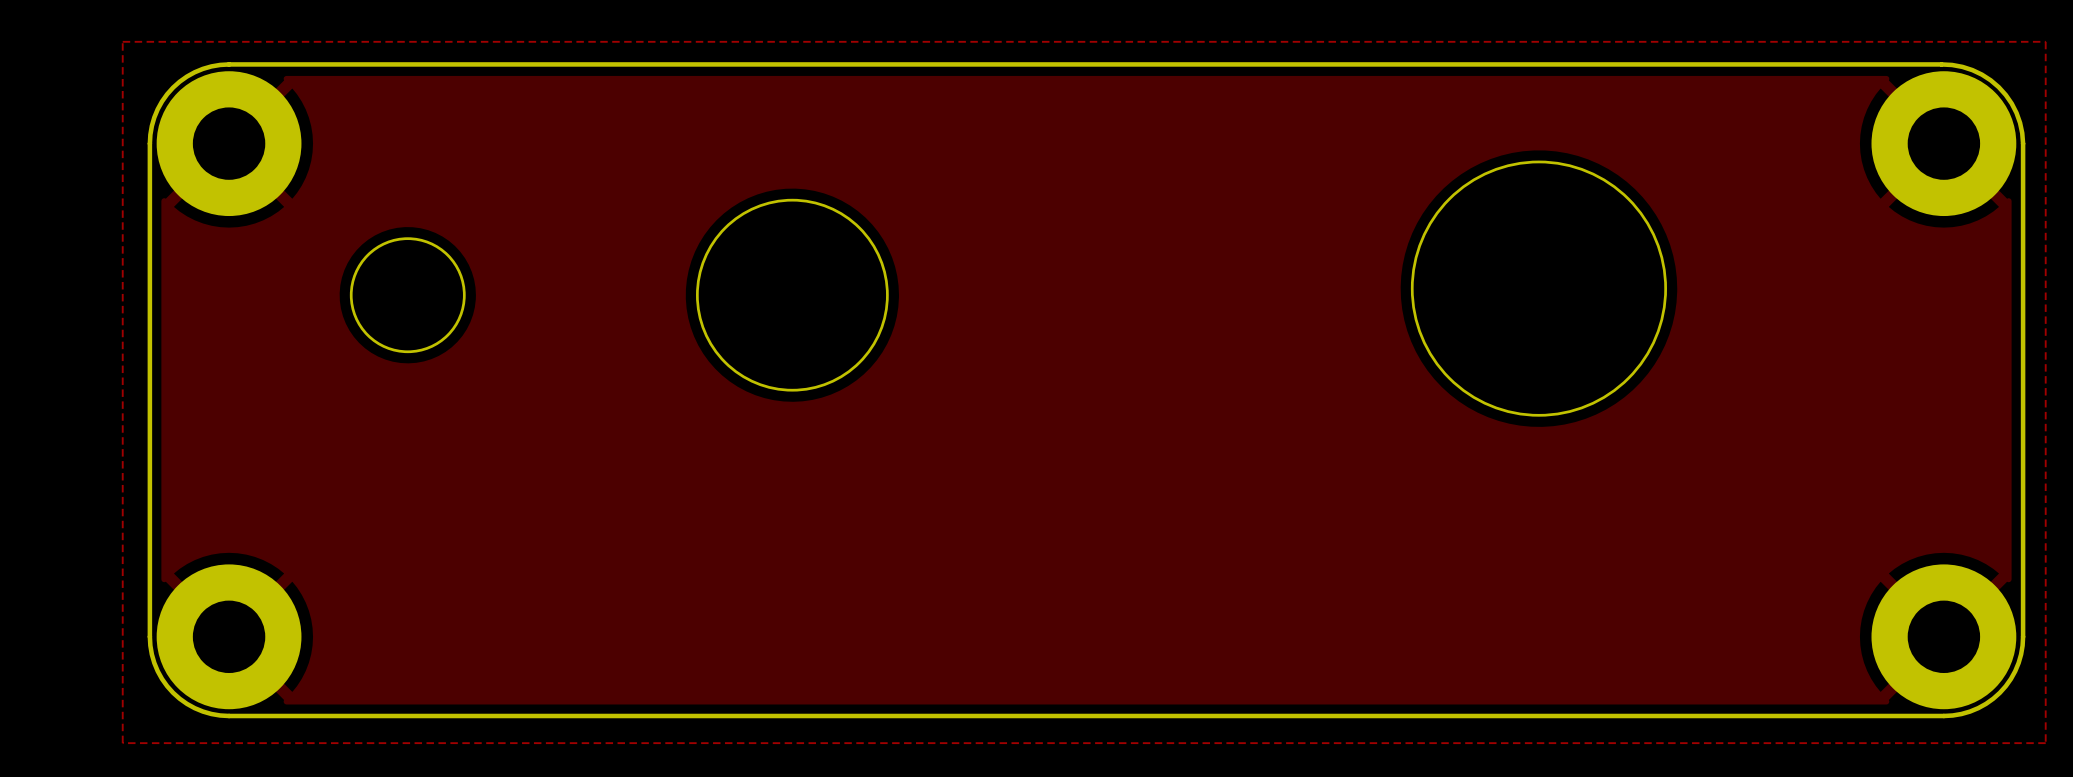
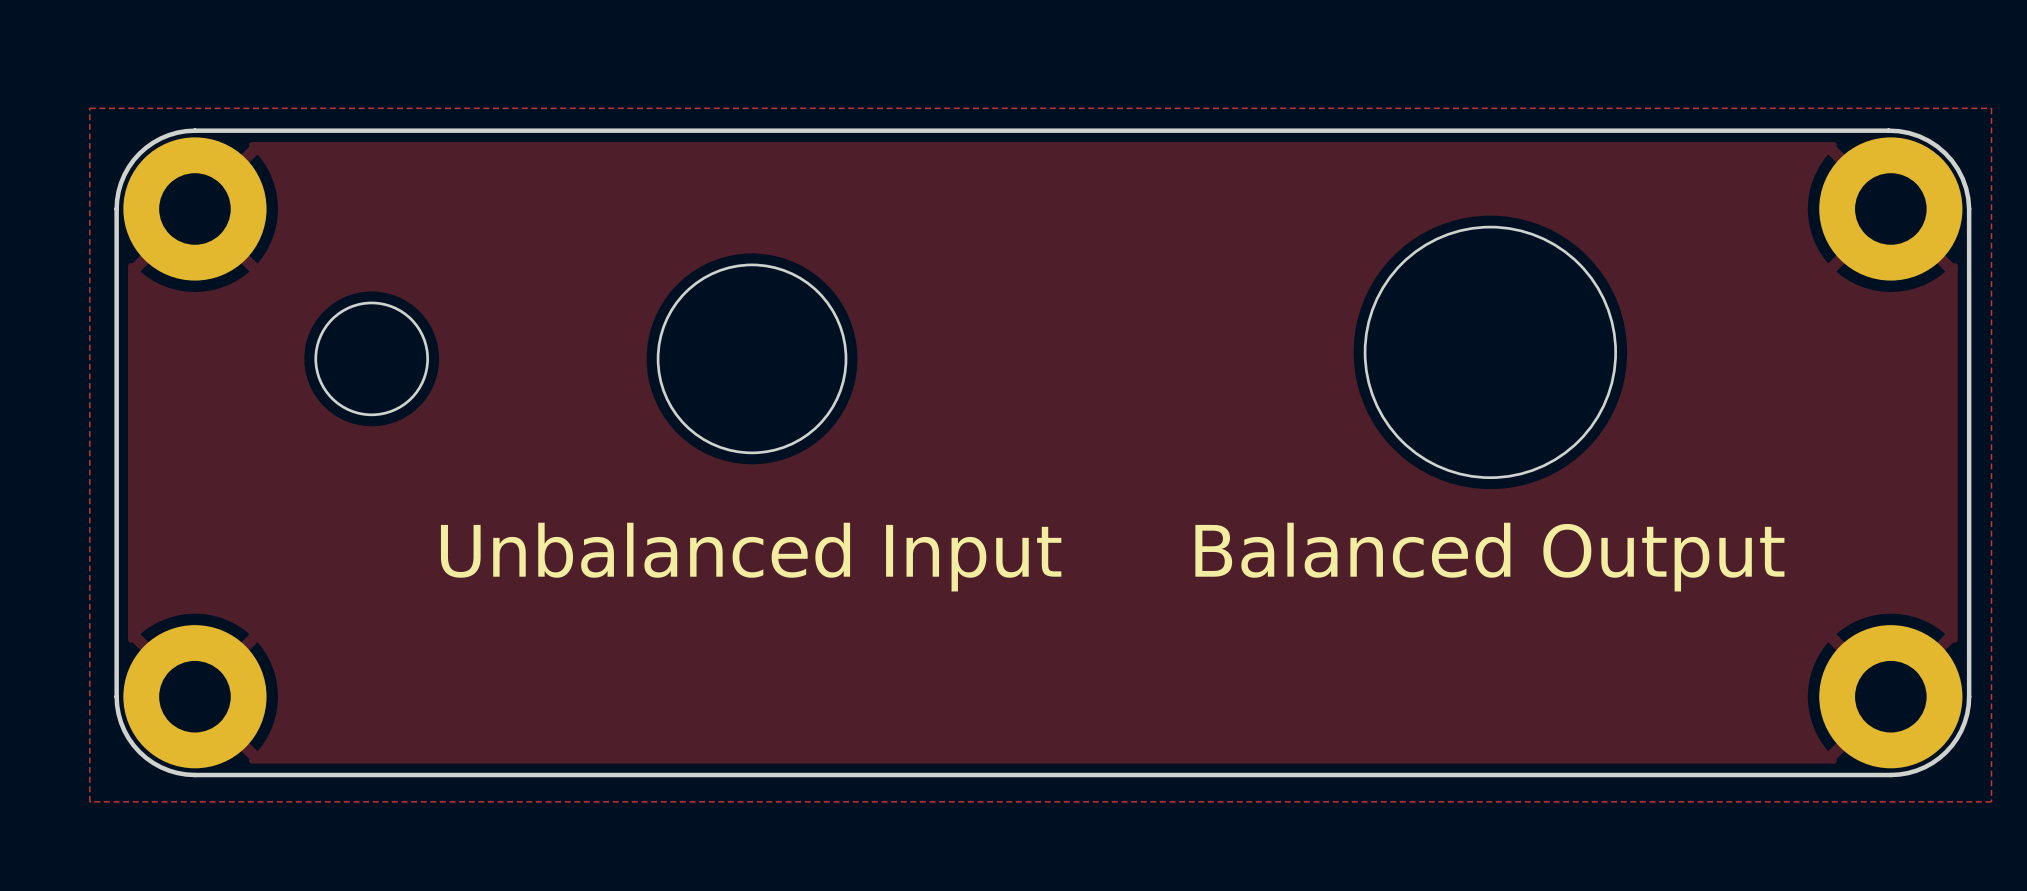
drawing: none -> [440, 522, 1062, 592]
drawing: none -> [1195, 522, 1785, 592]

